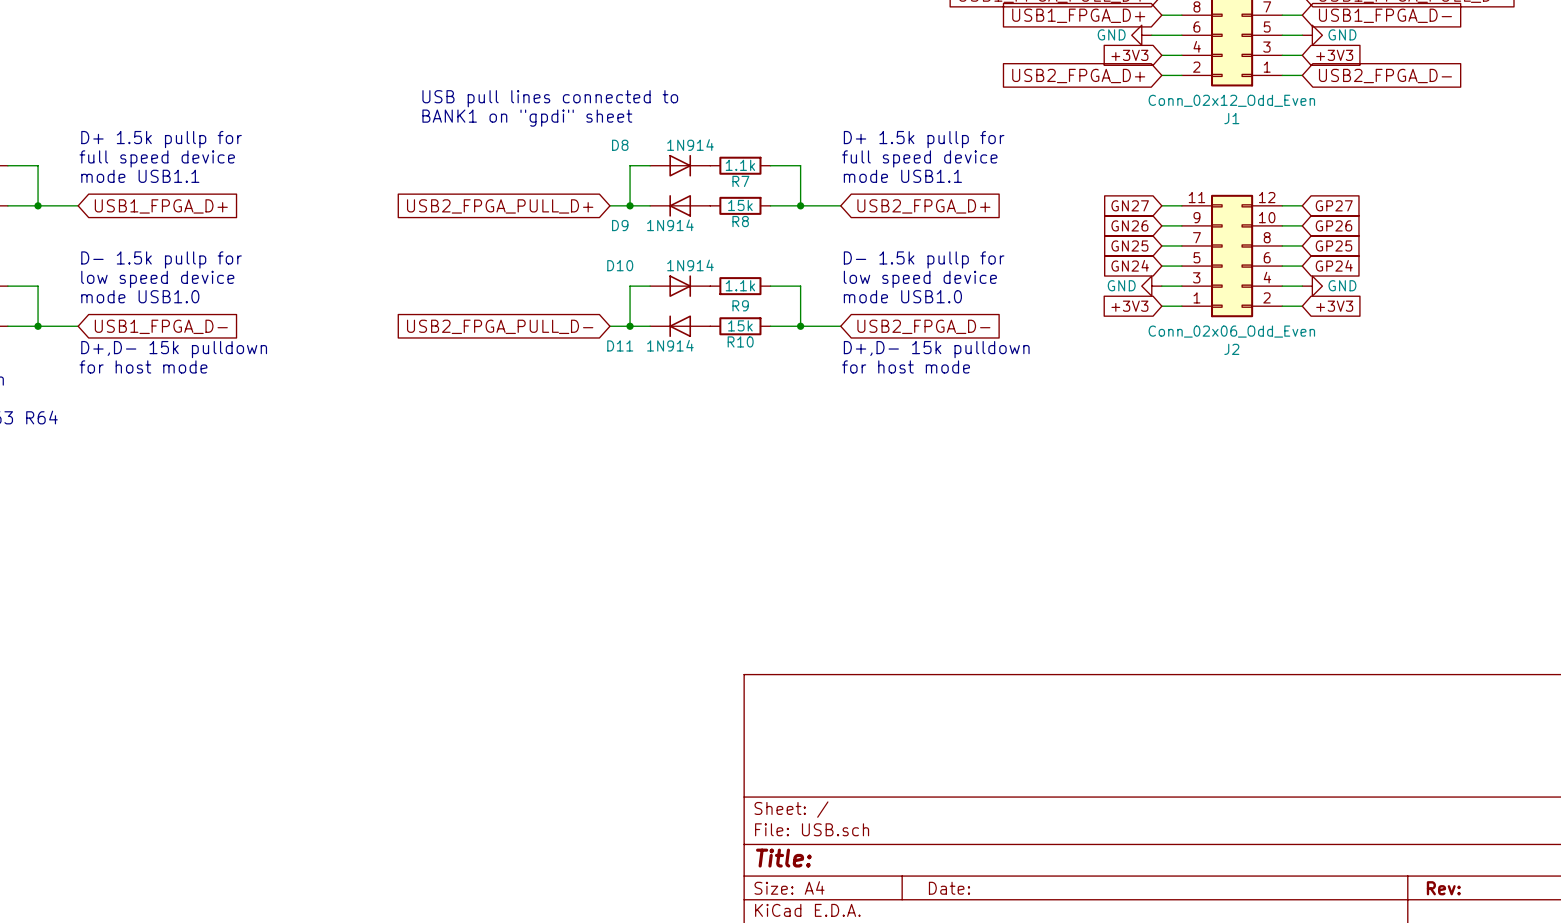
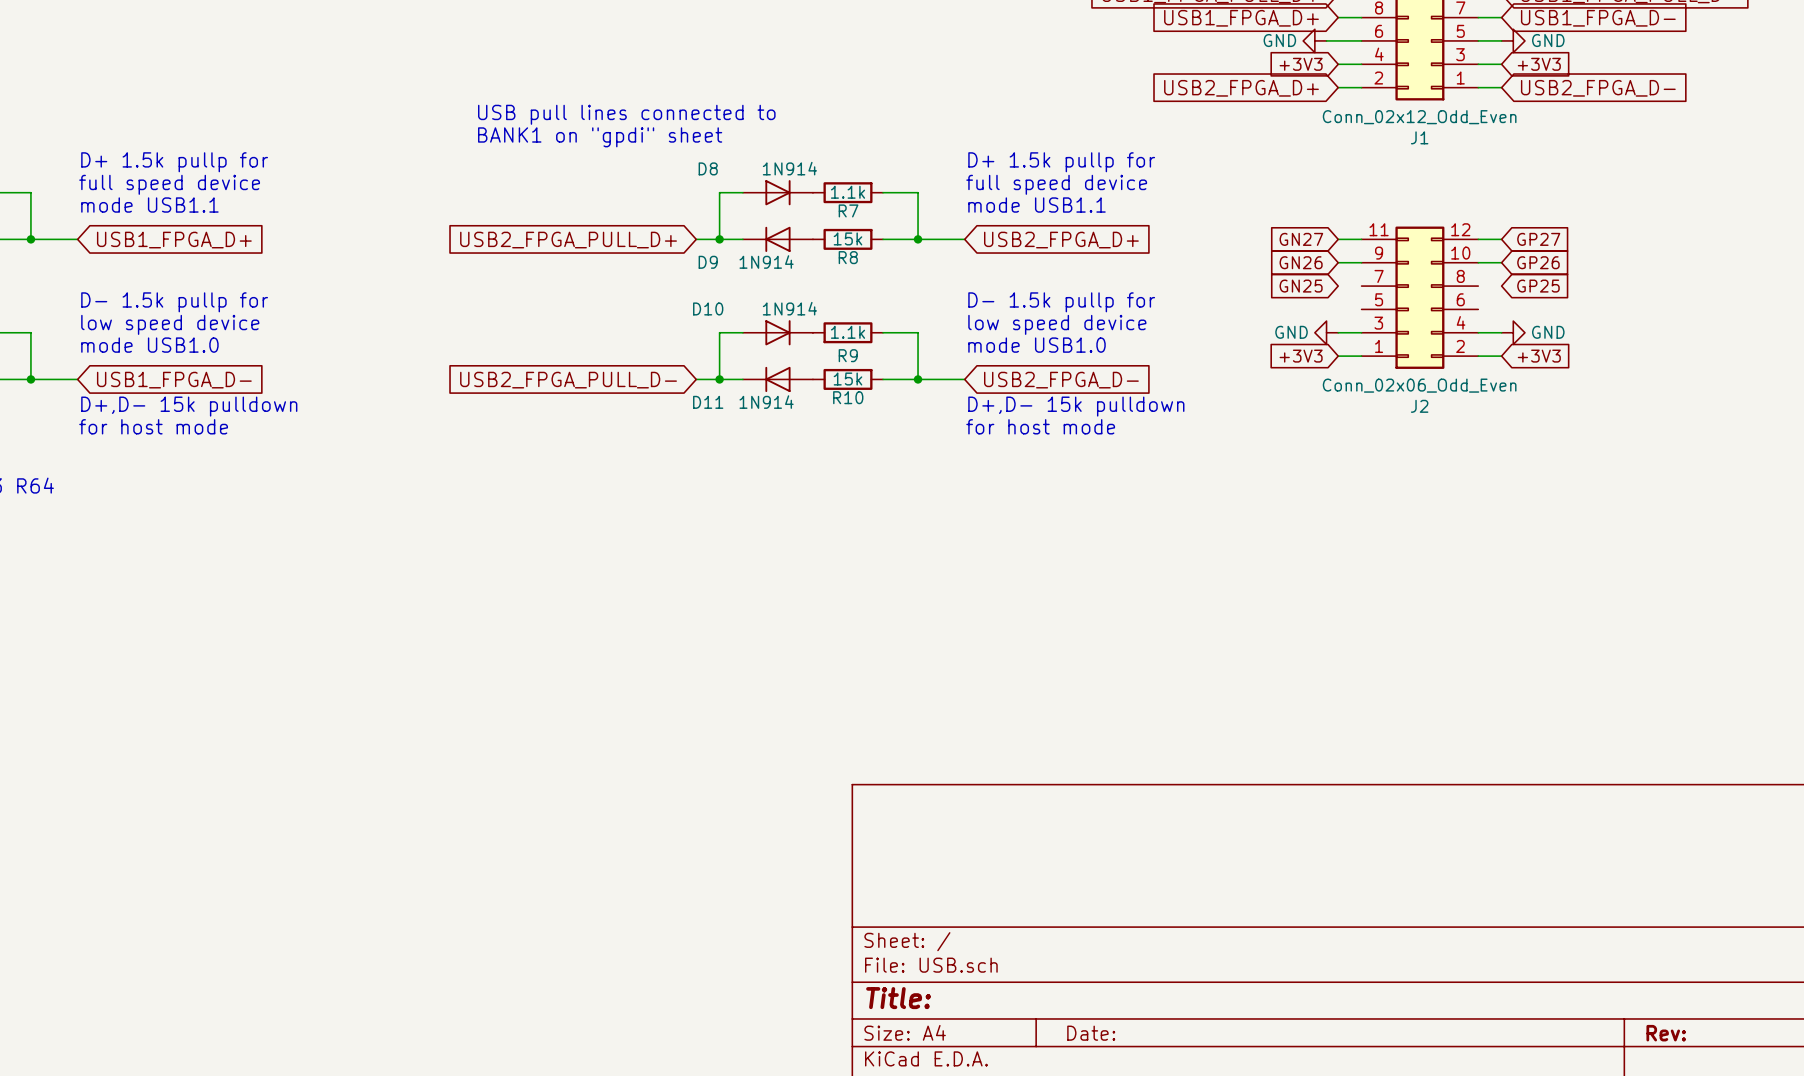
wire: (1161, 245) (1181, 245) -> none
wire: (1282, 245) (1302, 245) -> none
global label: GN24 (1130, 265) -> none
global label: GP24 (1334, 265) -> none
wire: (1161, 266) (1181, 266) -> none
wire: (1282, 266) (1302, 266) -> none

